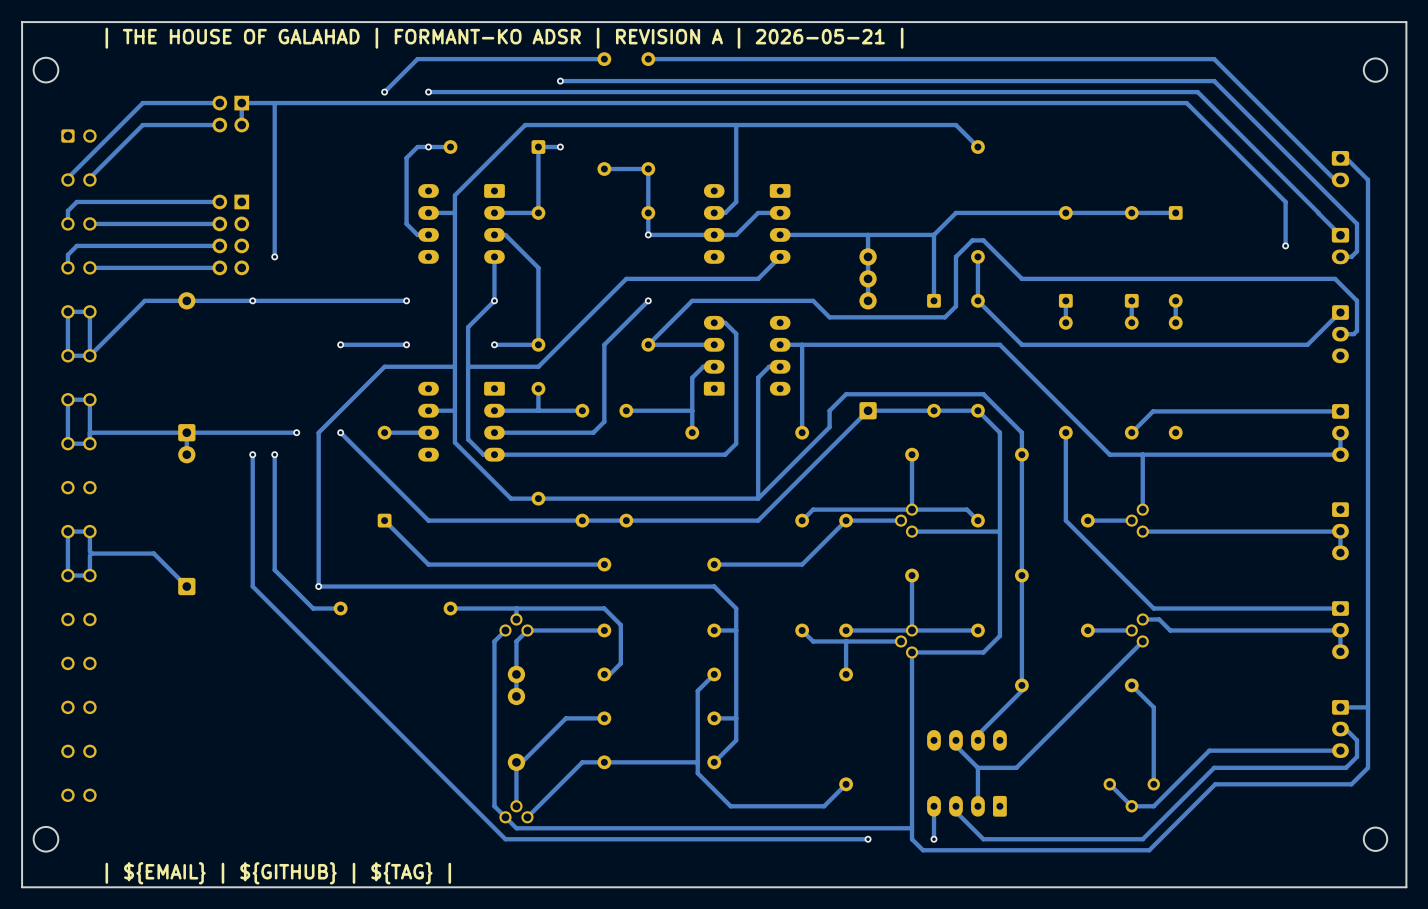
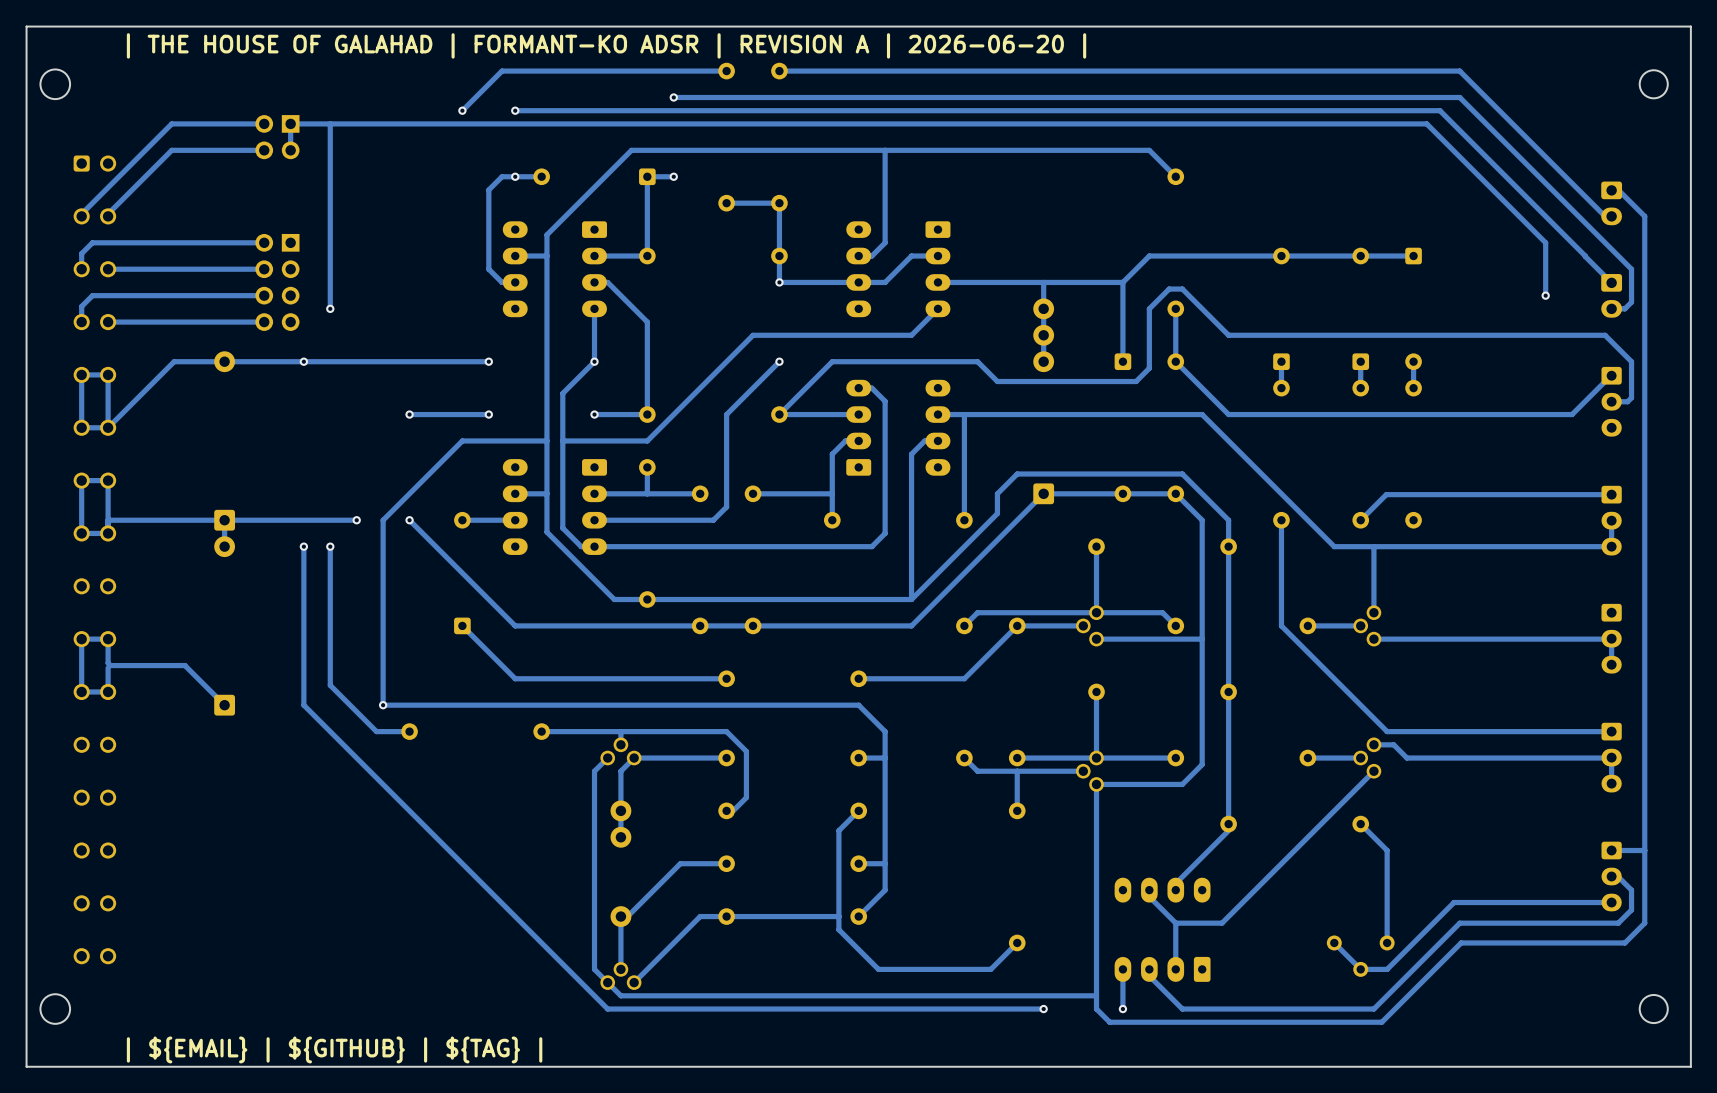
text: | THE HOUSE OF GALAHAD | FORMANT-KO ADSR | REVISION A | 2026-05-21 | (504, 38) -> | THE HOUSE OF GALAHAD | FORMANT-KO ADSR | REVISION A | 2026-06-20 | (606, 45)

